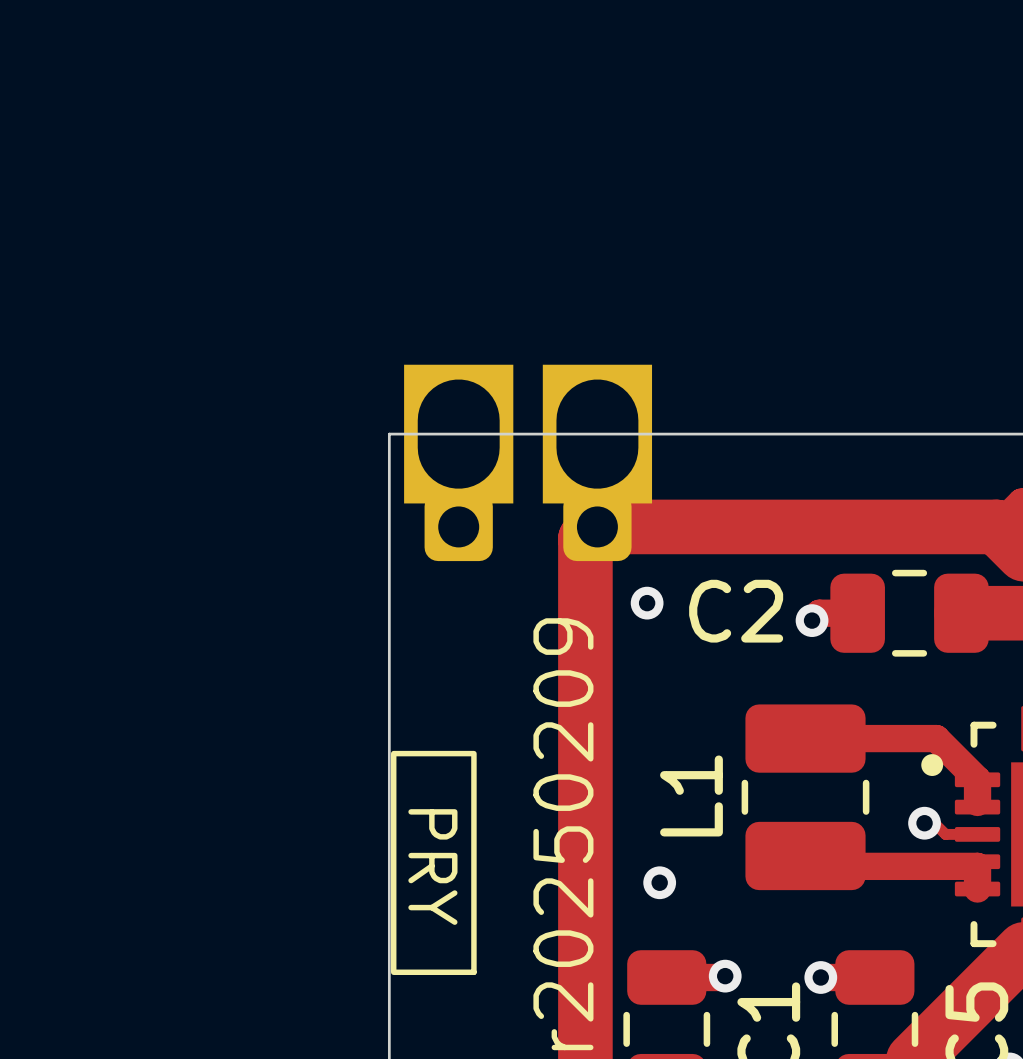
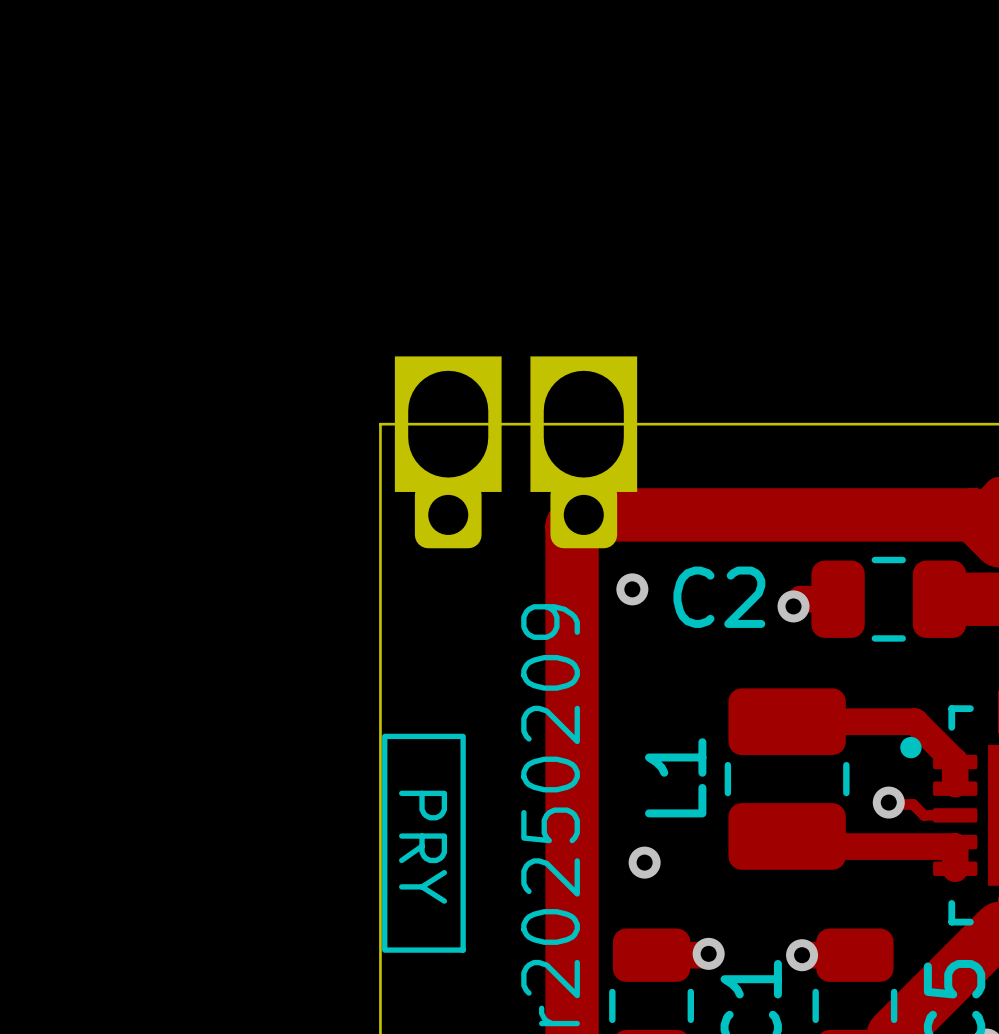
via position: (924, 823) -> (888, 802)

